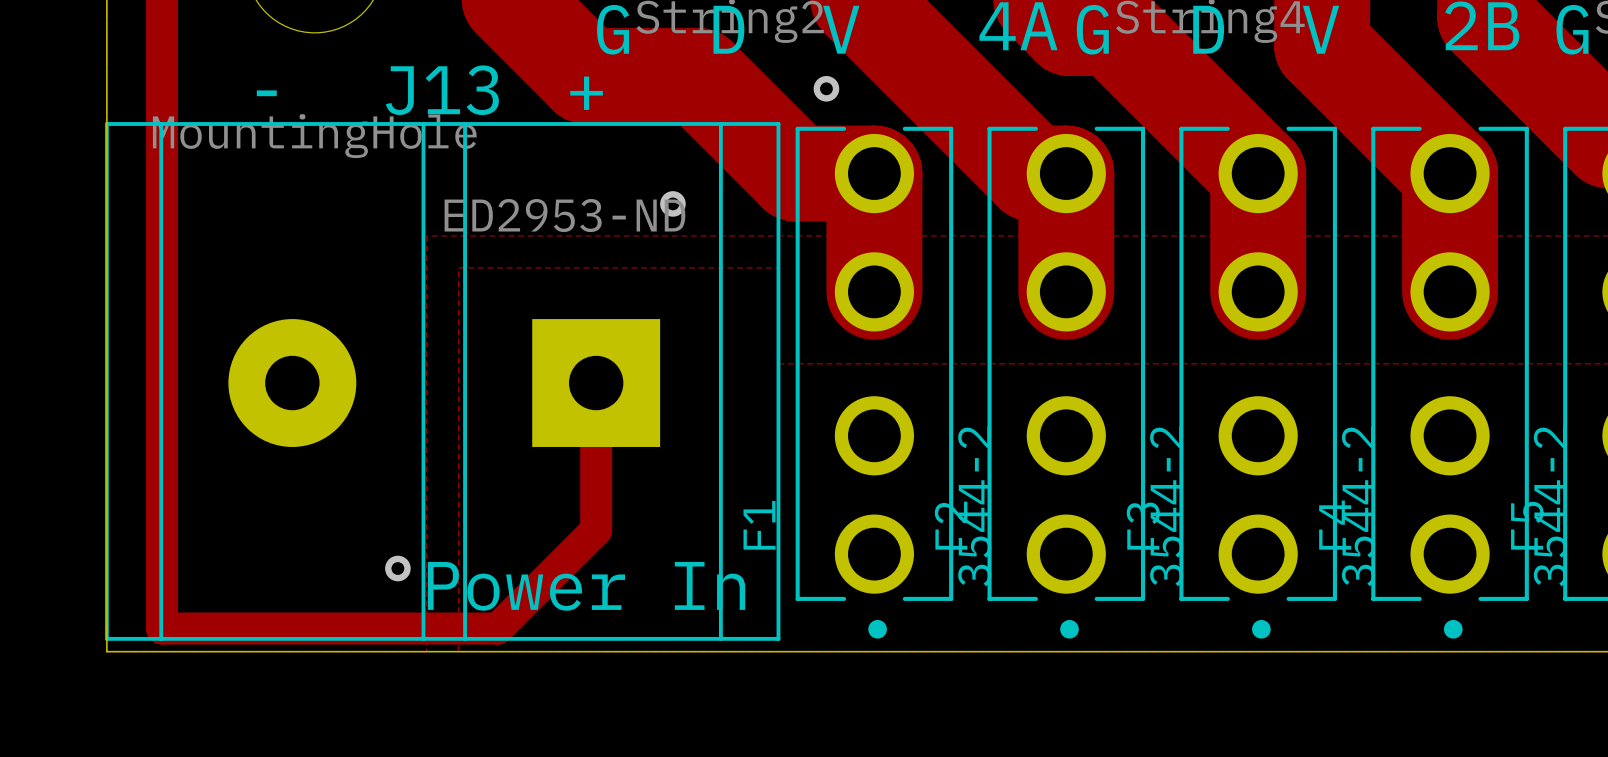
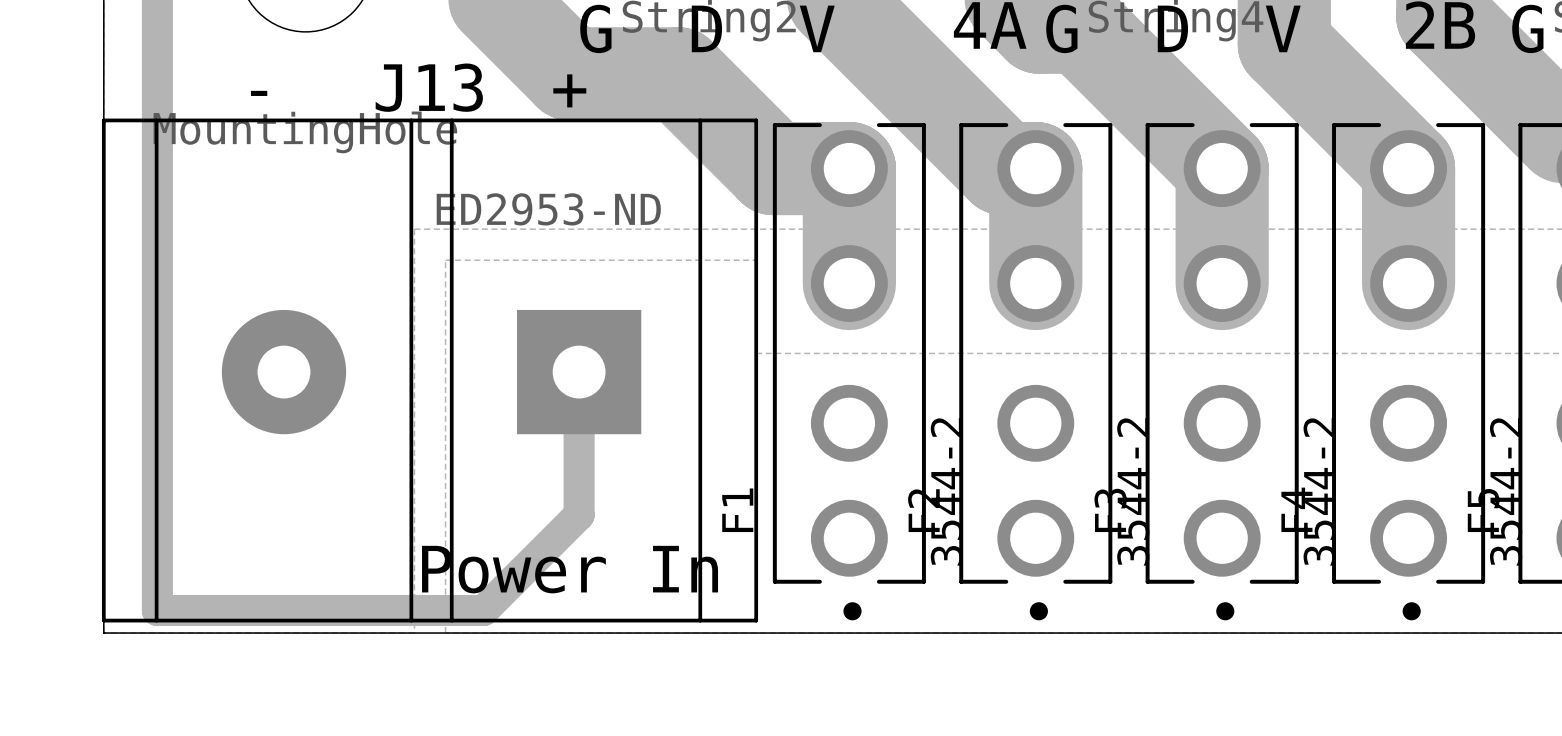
via: (826, 88) -> none
via: (672, 203) -> none
via: (397, 568) -> none

